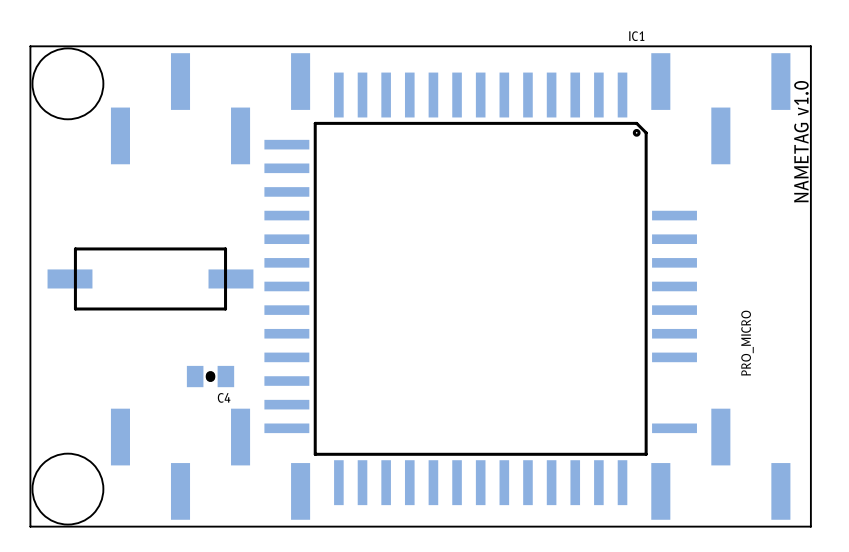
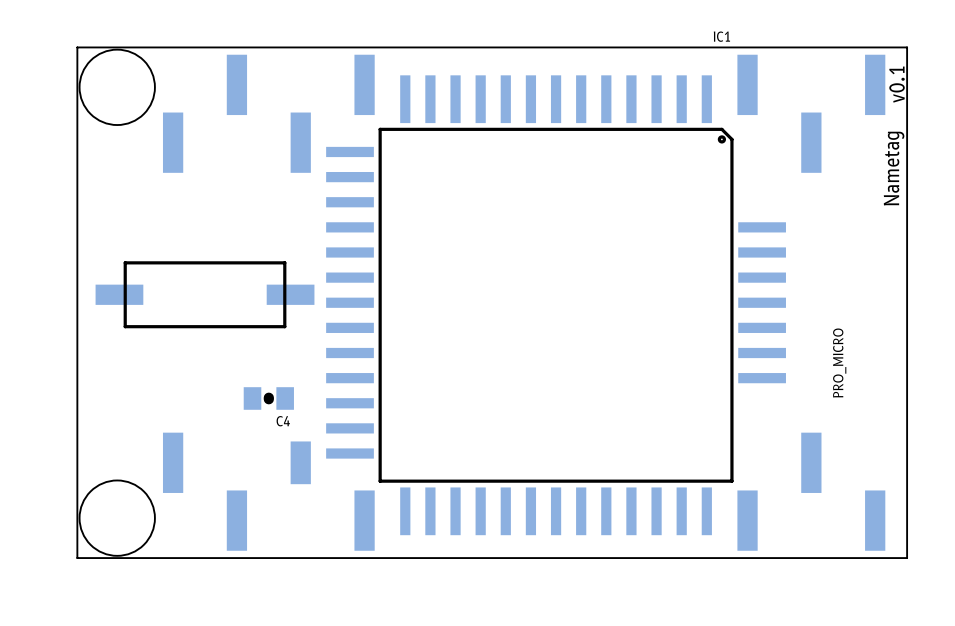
PRO_MICRO footprint: [110, 53, 791, 520] -> [162, 54, 886, 551]
IC1 footprint: [264, 72, 697, 506] -> [326, 75, 786, 536]
text: none -> v0.1 (897, 84)
text: NAMETAG v1.0 (801, 141) -> Nametag (894, 168)

